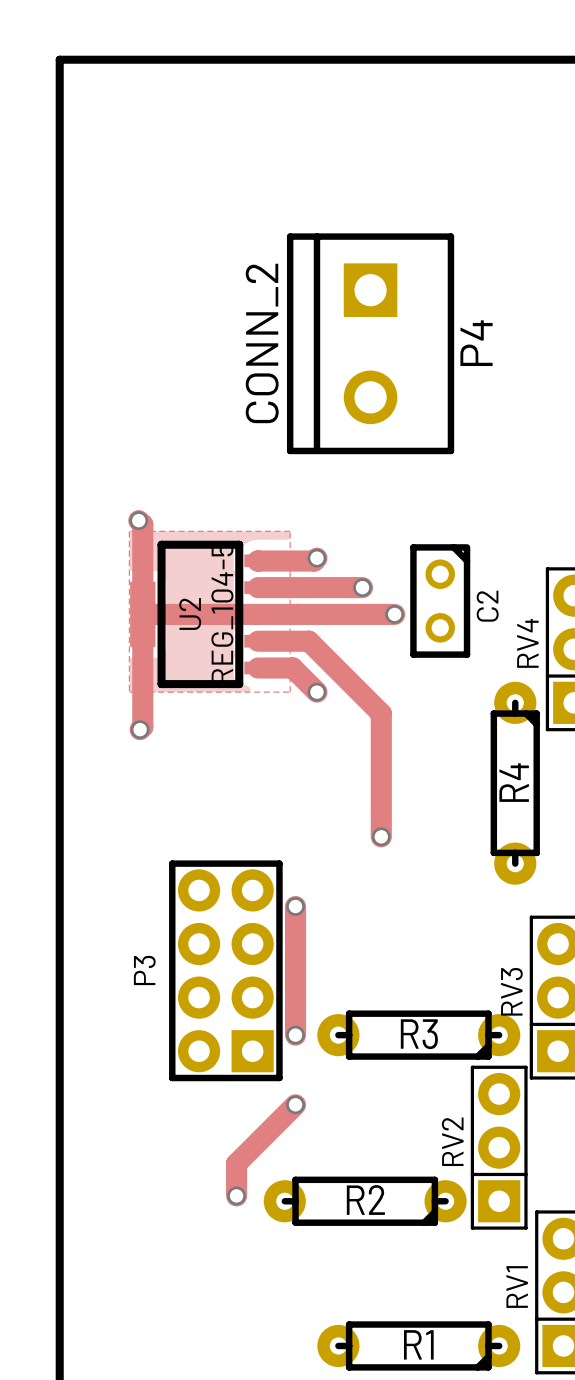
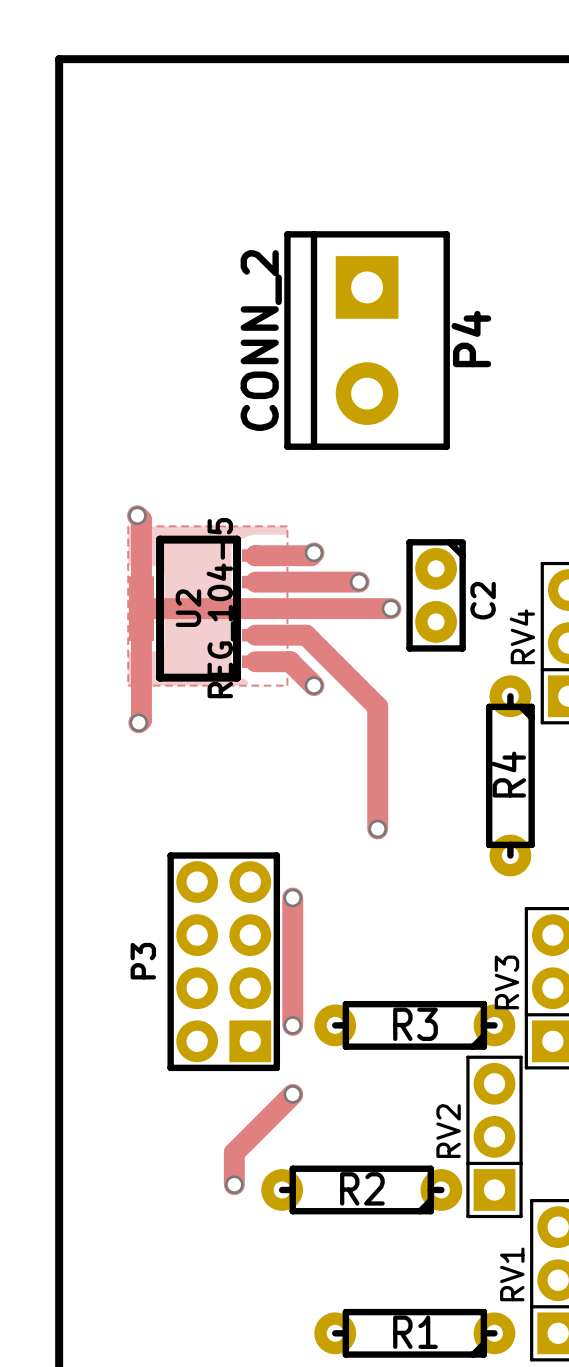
P4 footprint: [286, 233, 455, 455] -> [284, 231, 450, 450]
C2 footprint: [410, 544, 471, 658] -> [406, 539, 466, 652]

